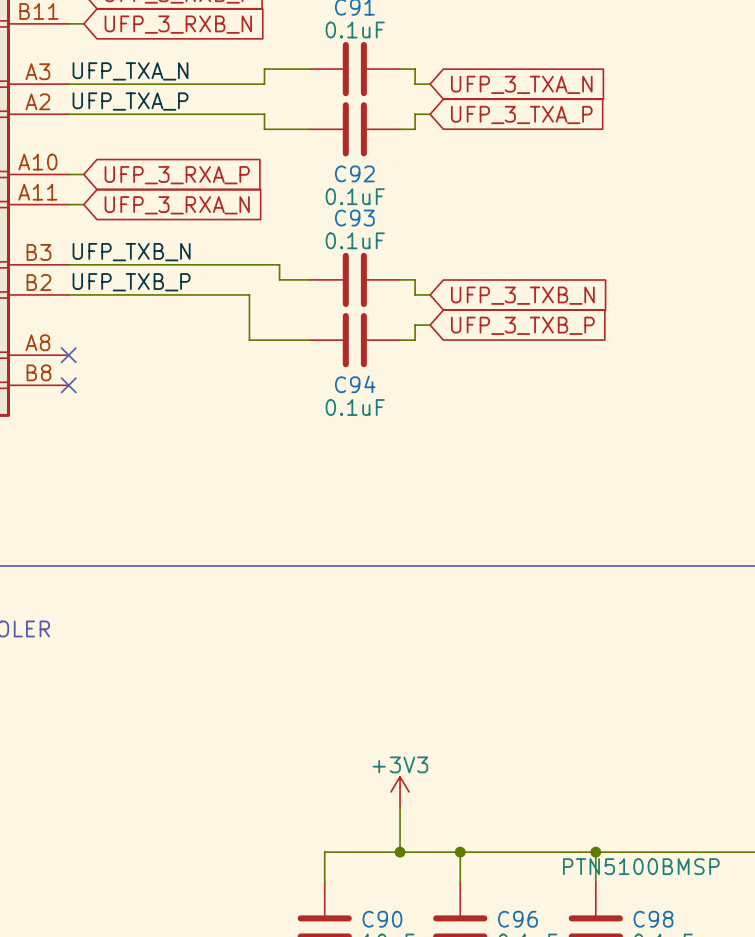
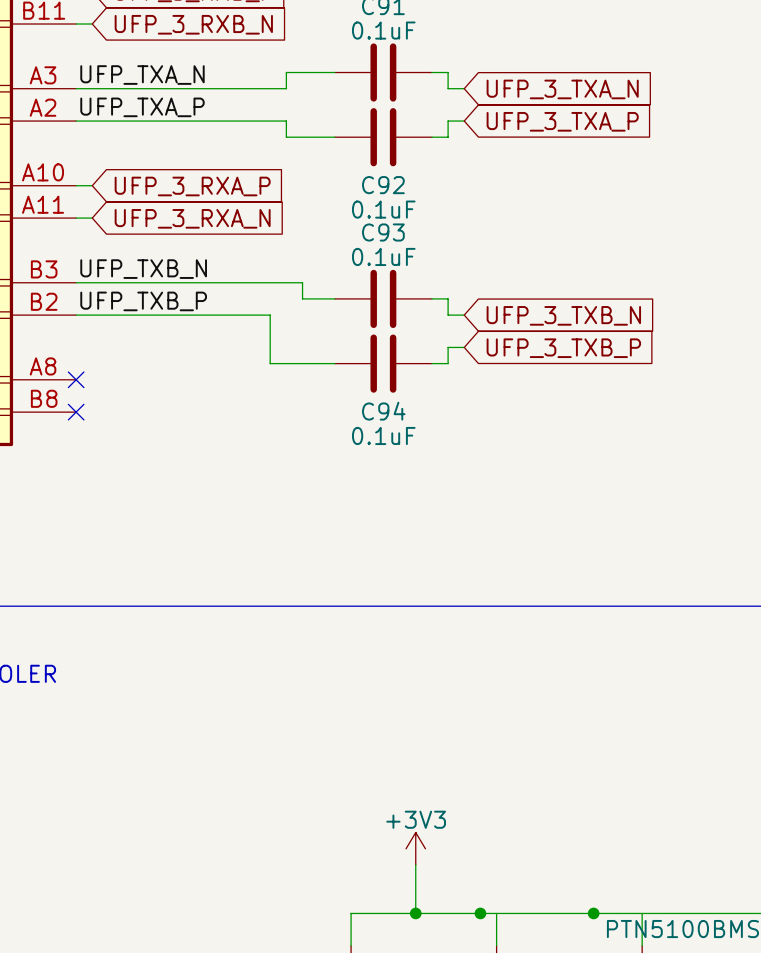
power symbol position: +3V3 (400, 791) -> +3V3 (415, 848)
wire: (400, 806) (400, 852) -> (415, 864) (415, 913)
junction position: (400, 852) -> (415, 913)
junction position: (460, 852) -> (480, 913)
junction: none -> (593, 913)
junction: (595, 852) -> none

